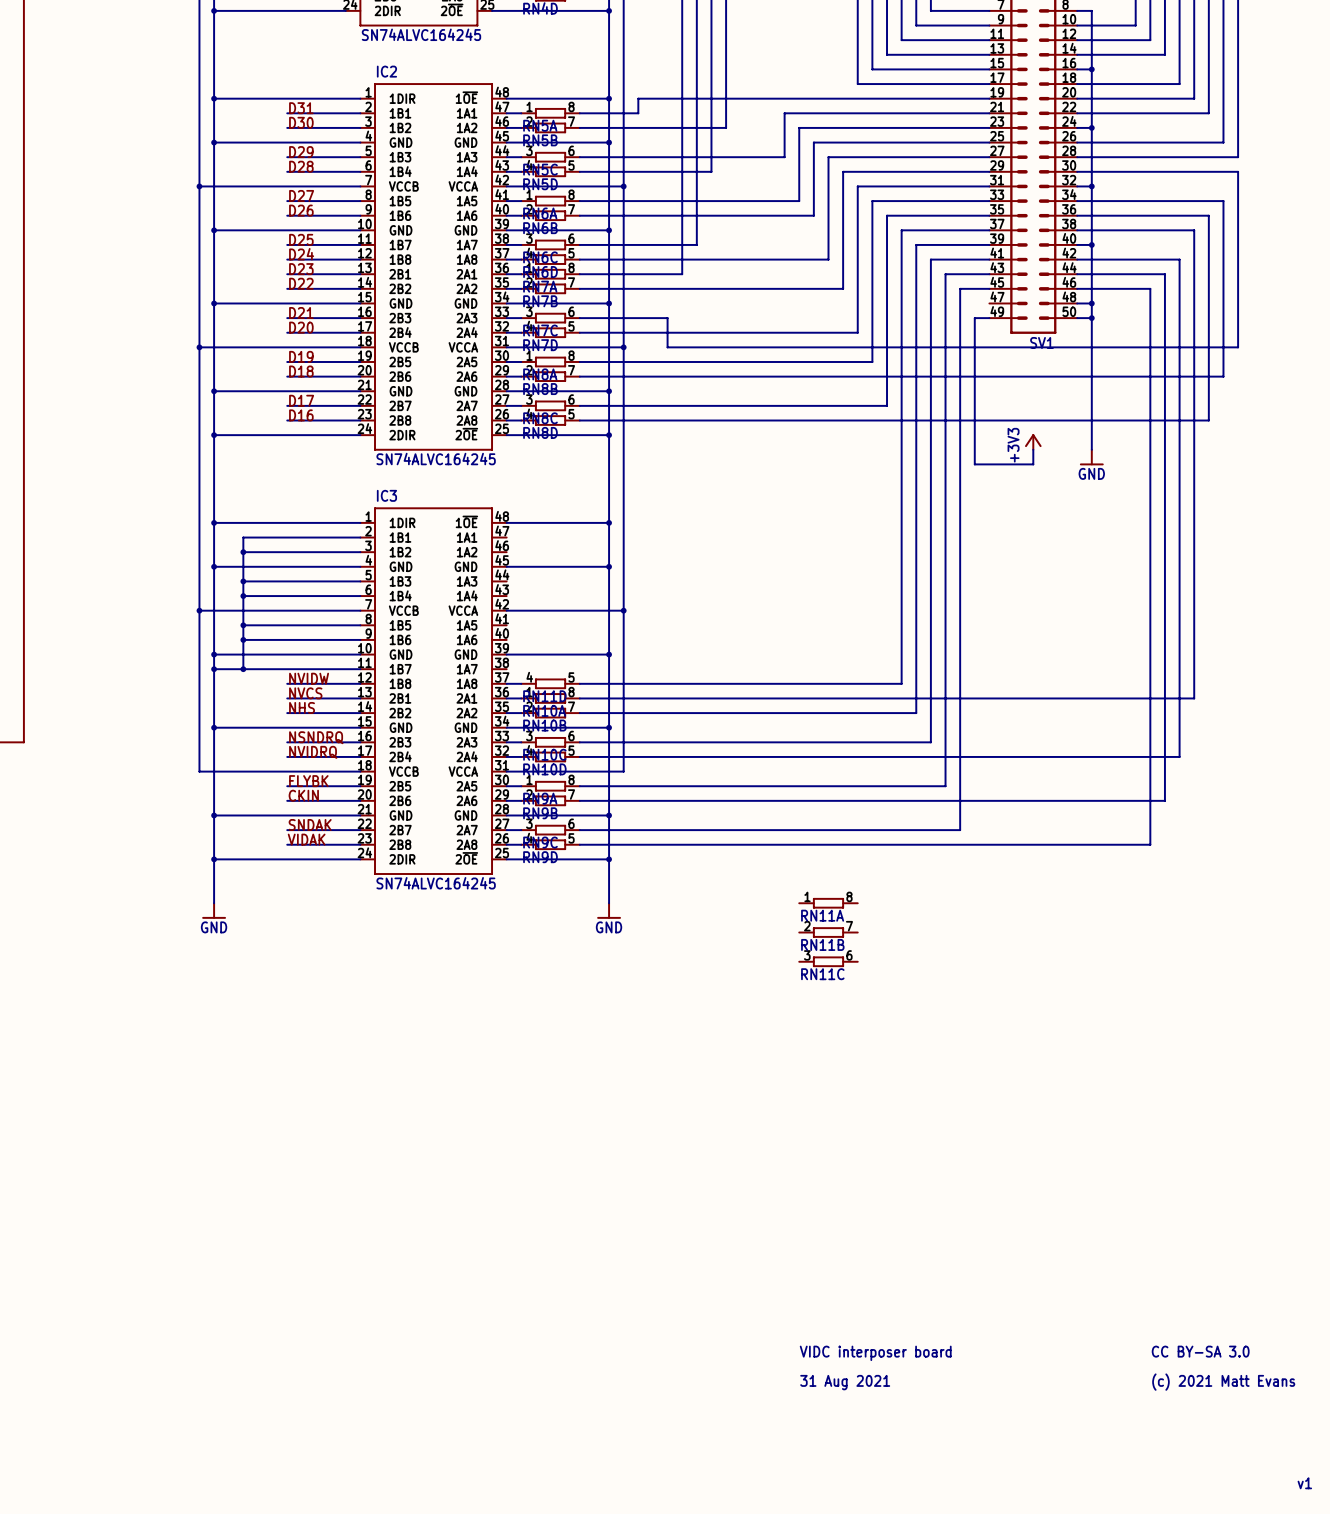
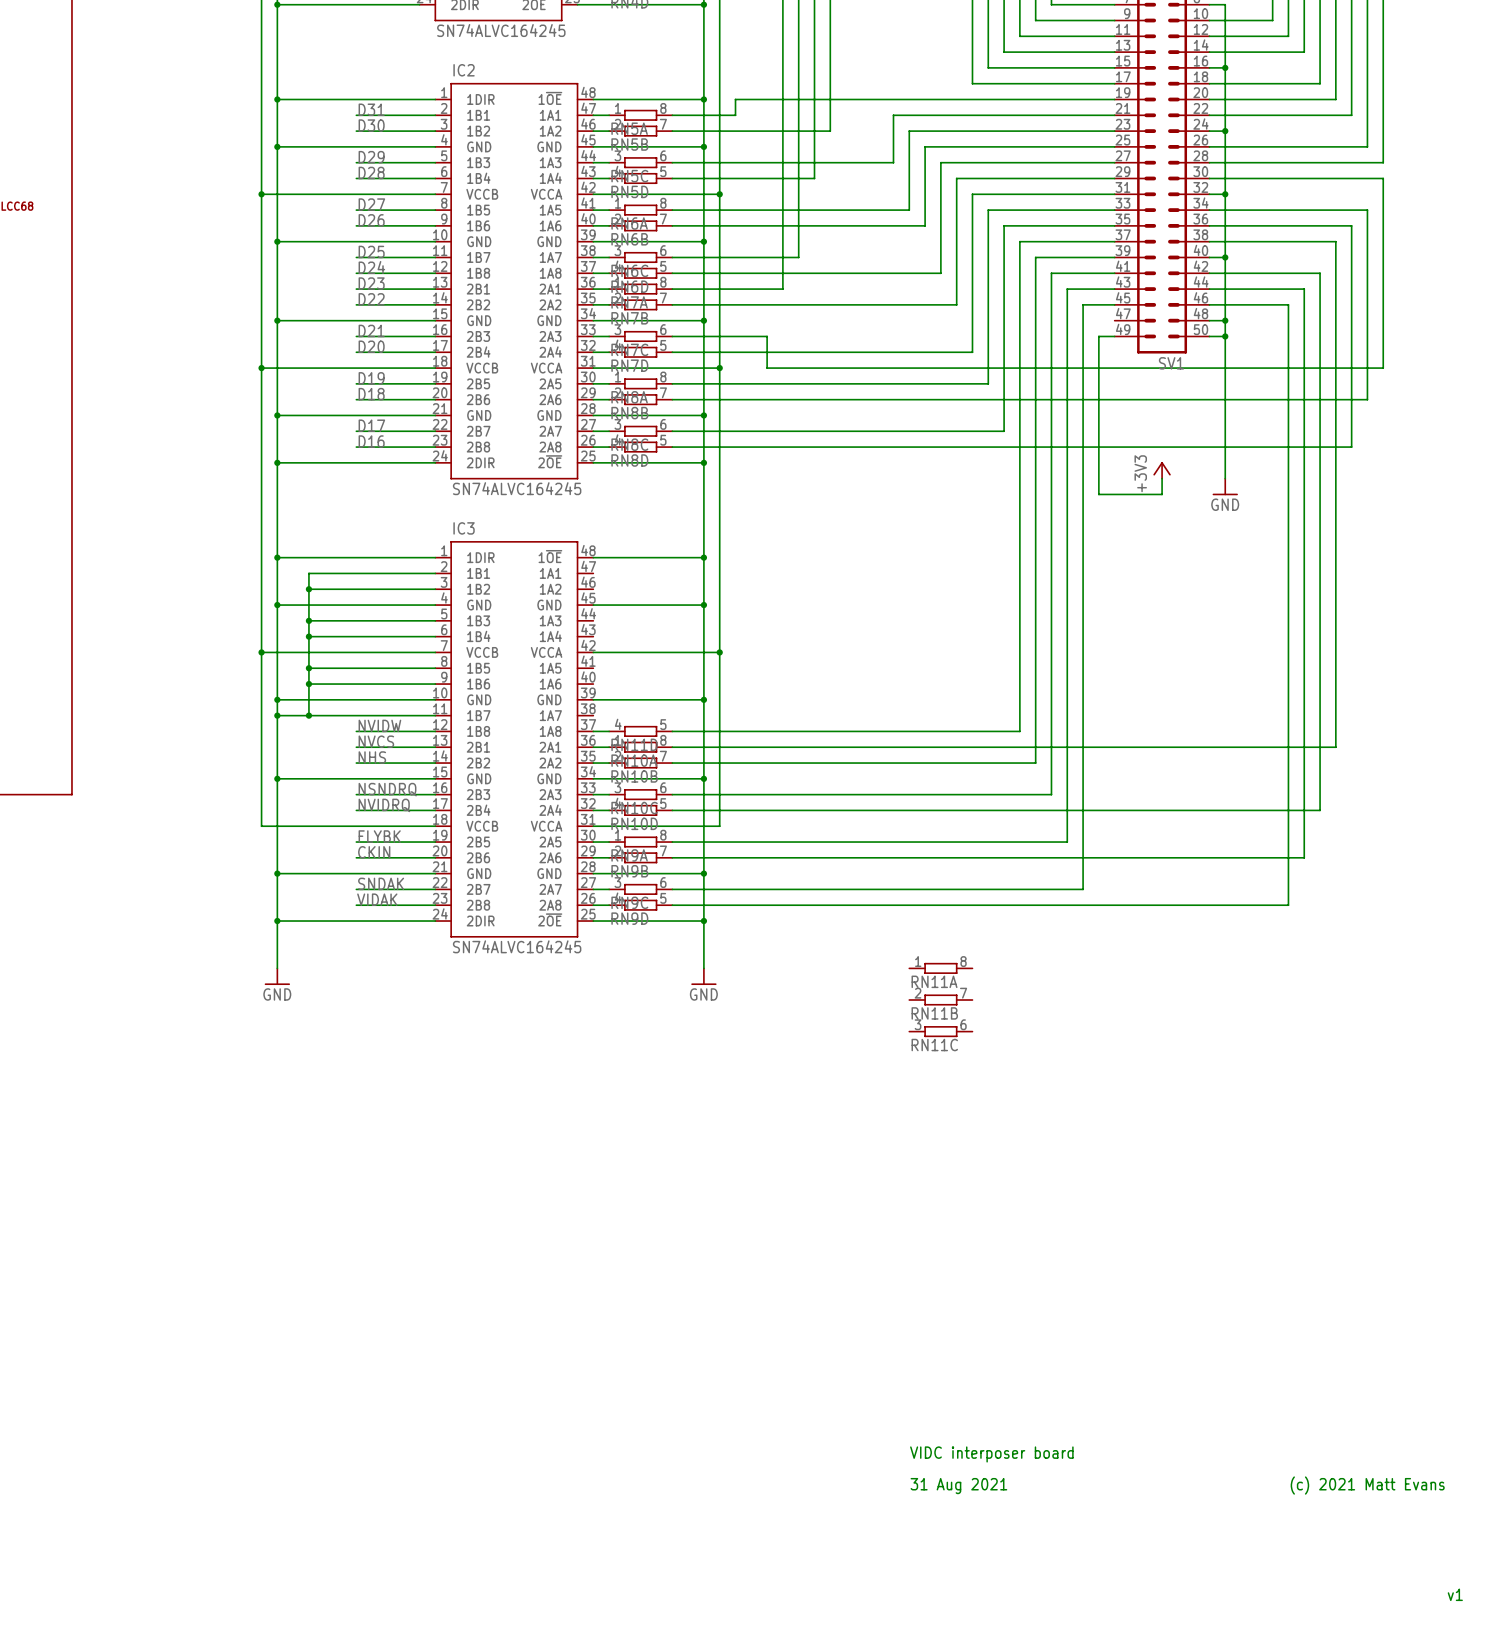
text: CC BY-SA 3.0 (1200, 1351) -> none

